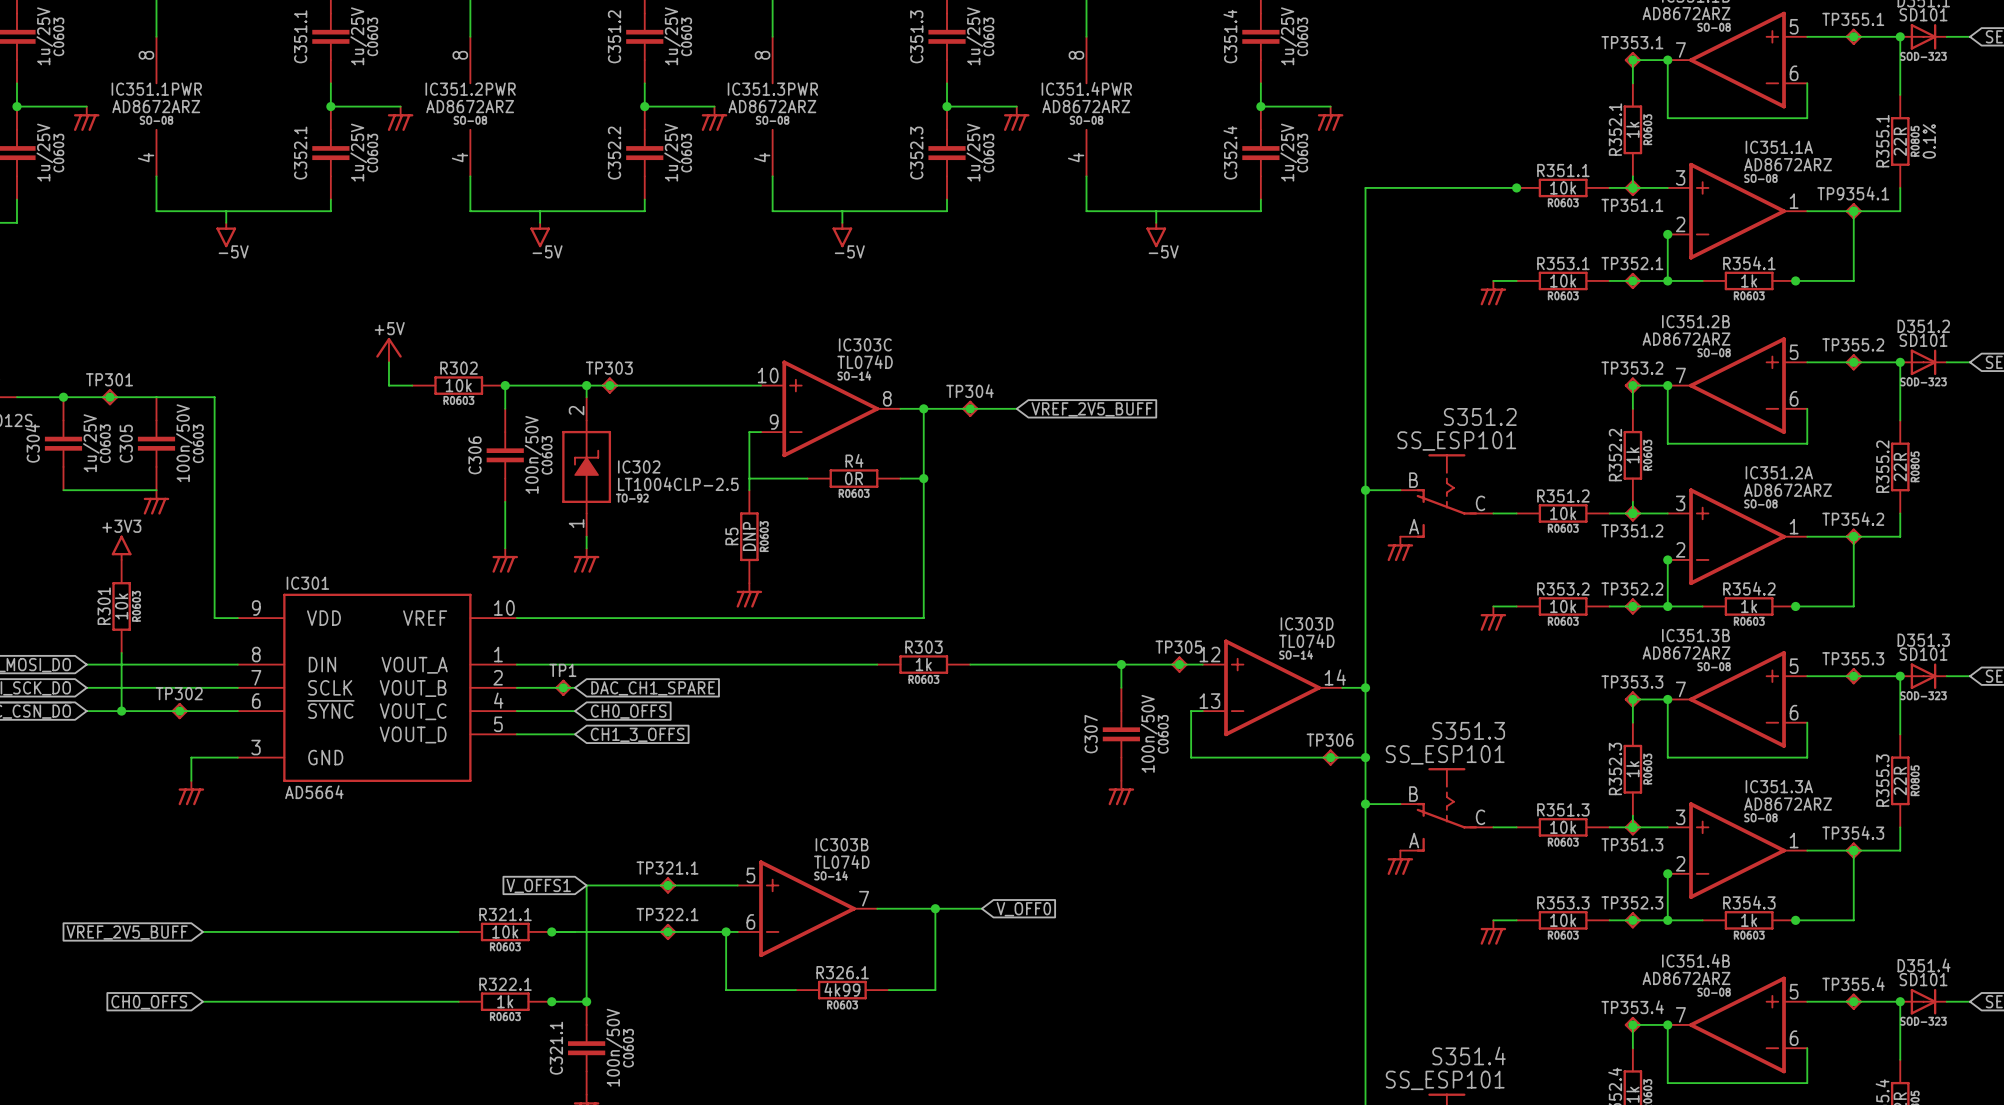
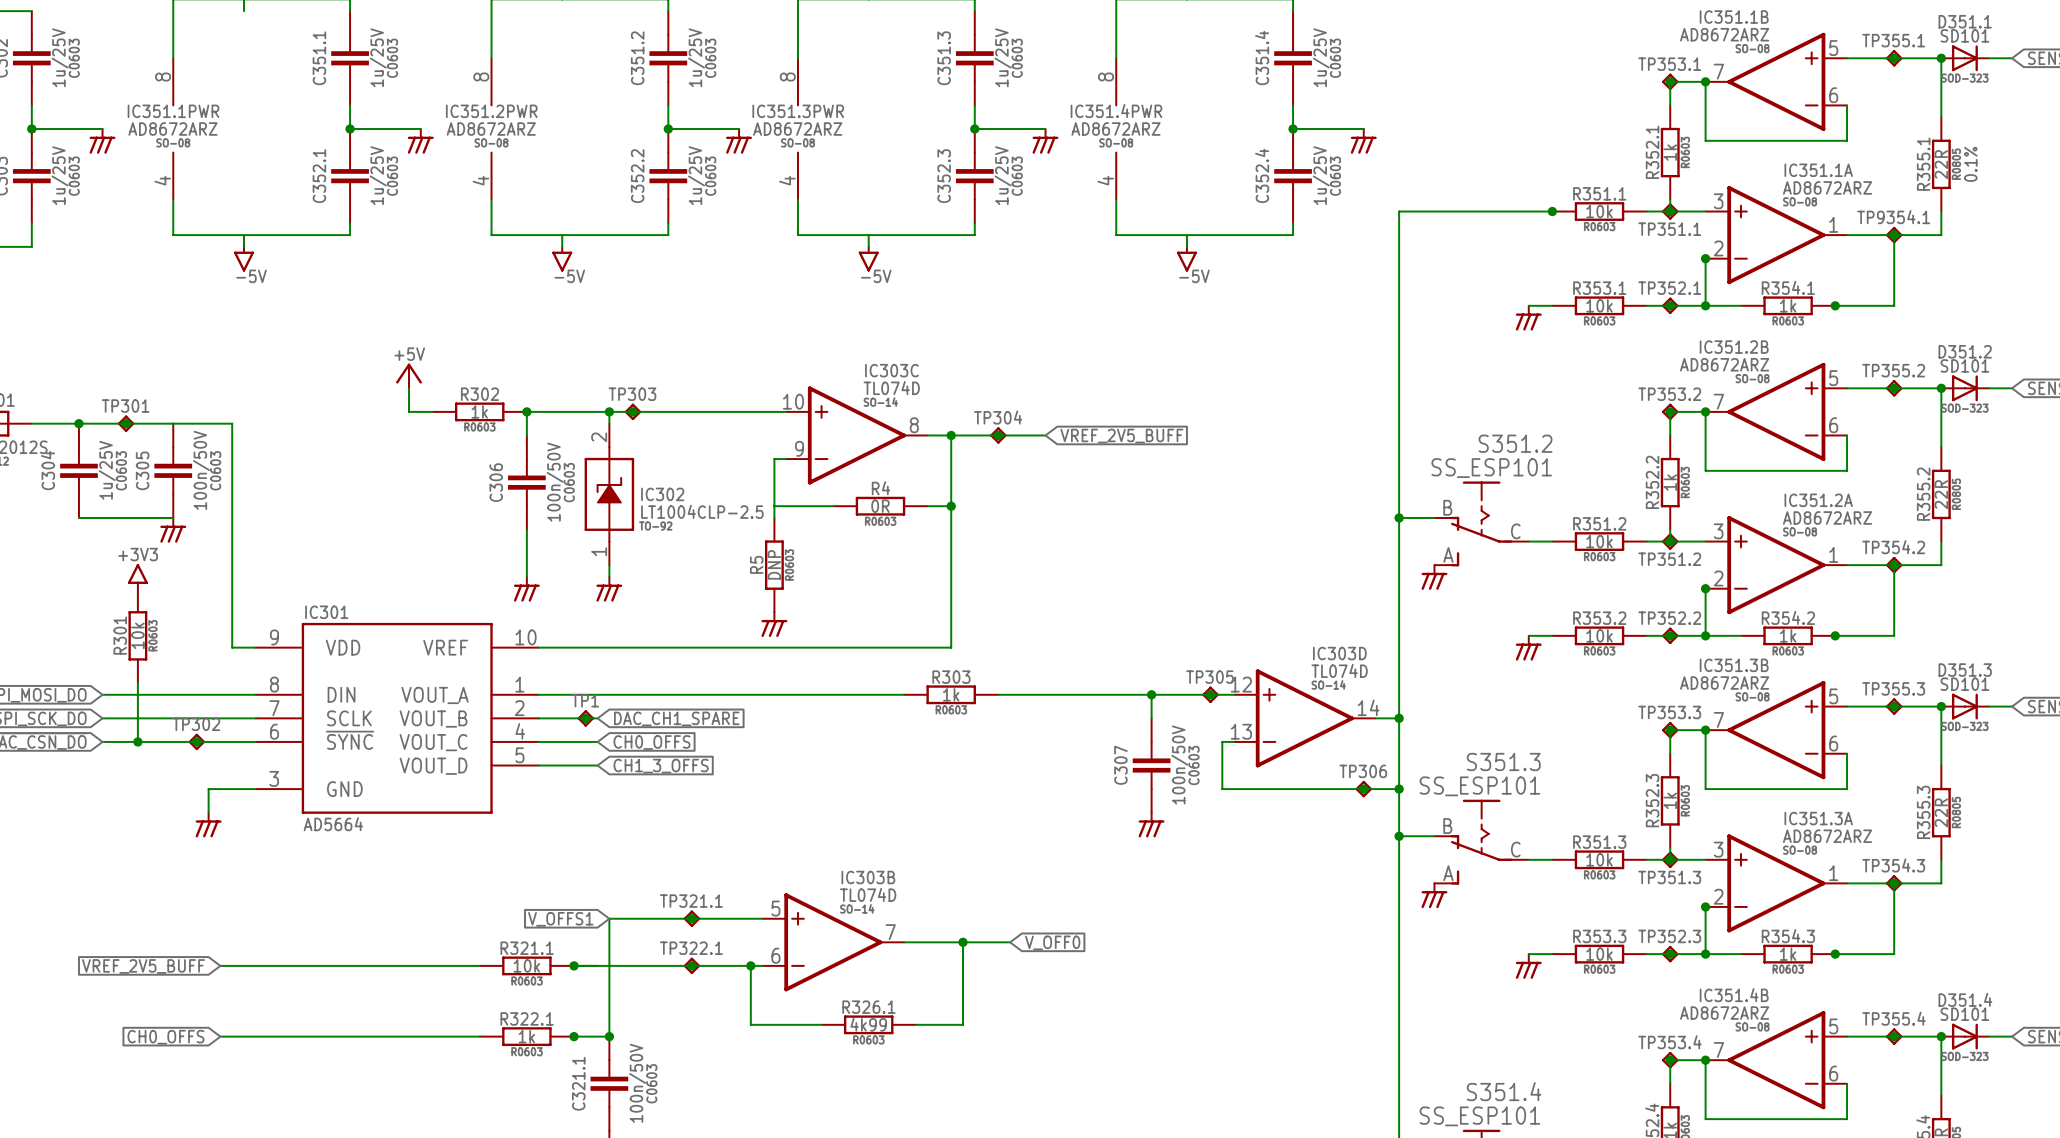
R302 value: 10k (458, 385) -> 1k (479, 411)

